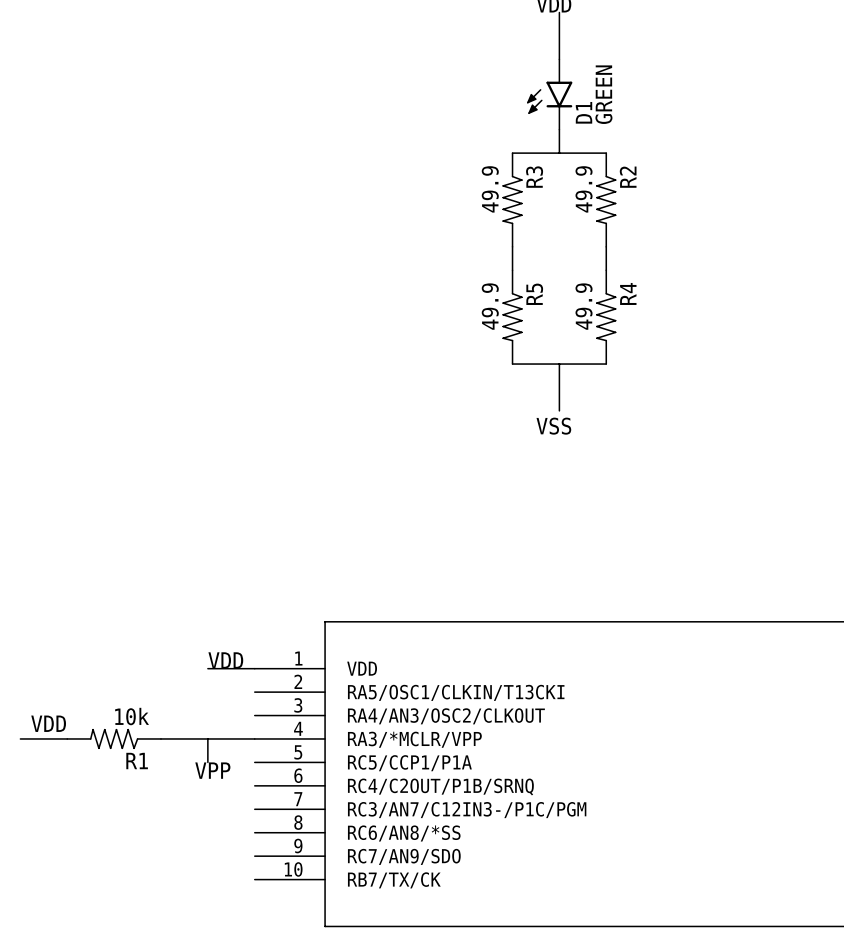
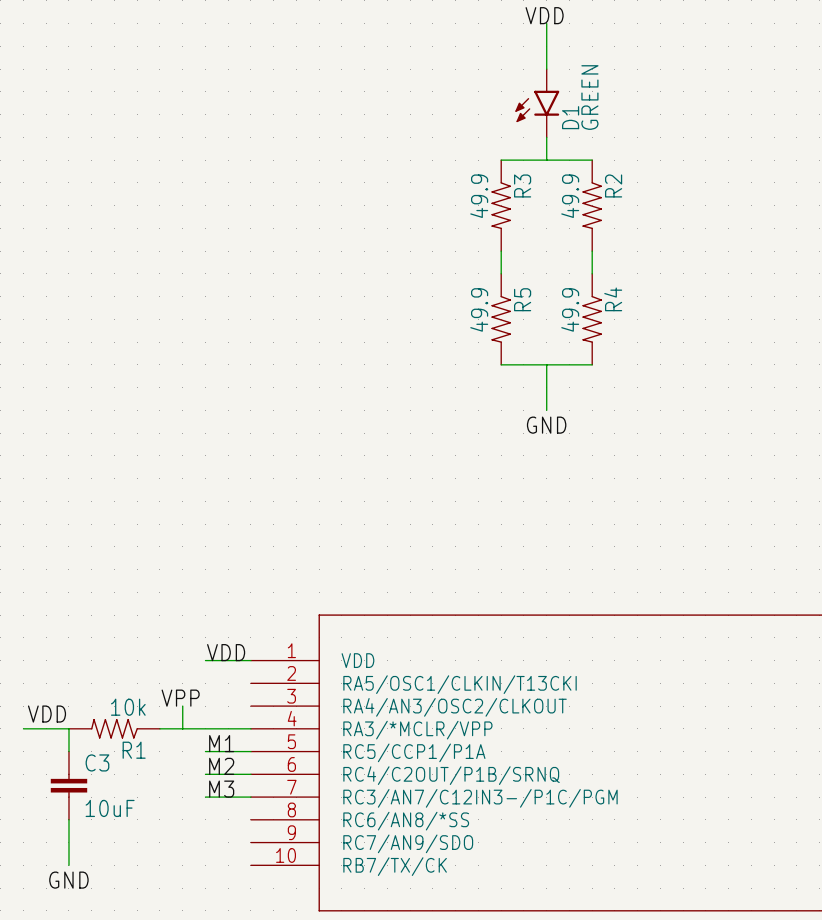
label: VSS (553, 426) -> GND (546, 425)
wire: none -> (182, 706) (182, 728)
wire: none -> (68, 728) (68, 751)
wire: (207, 738) (207, 762) -> (250, 751) (205, 751)
label: none -> M1 (221, 743)
label position: VPP (212, 770) -> VPP (180, 698)
label: none -> M2 (221, 766)
wire: none -> (205, 774) (250, 774)
C3: none -> 10uF (68, 785)
label: none -> M3 (221, 789)
wire: none -> (205, 797) (250, 797)
wire: none -> (68, 819) (68, 865)
label: none -> GND (68, 880)

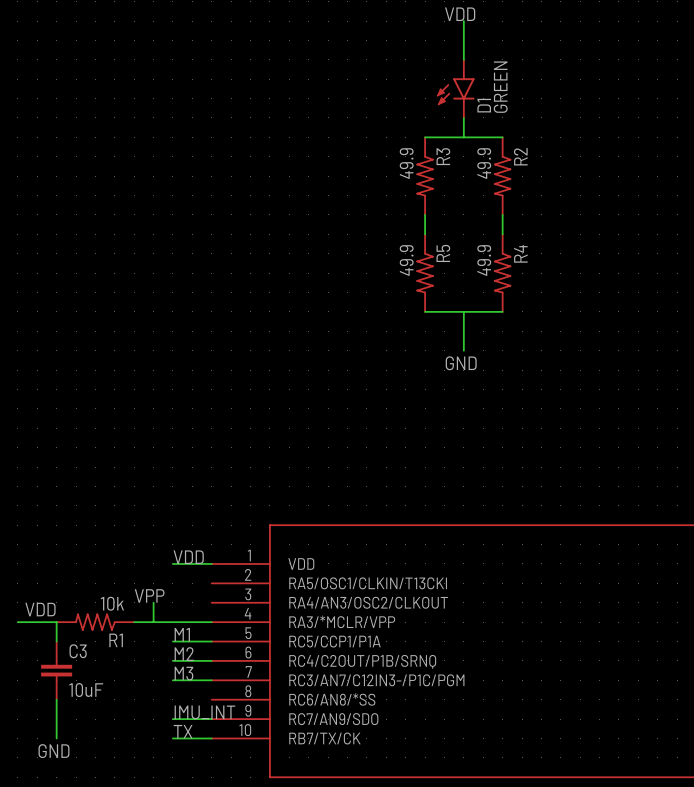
label: none -> IMU_INT (204, 712)
wire: none -> (172, 719) (211, 719)
label: none -> TX (183, 731)
wire: none -> (172, 738) (211, 738)

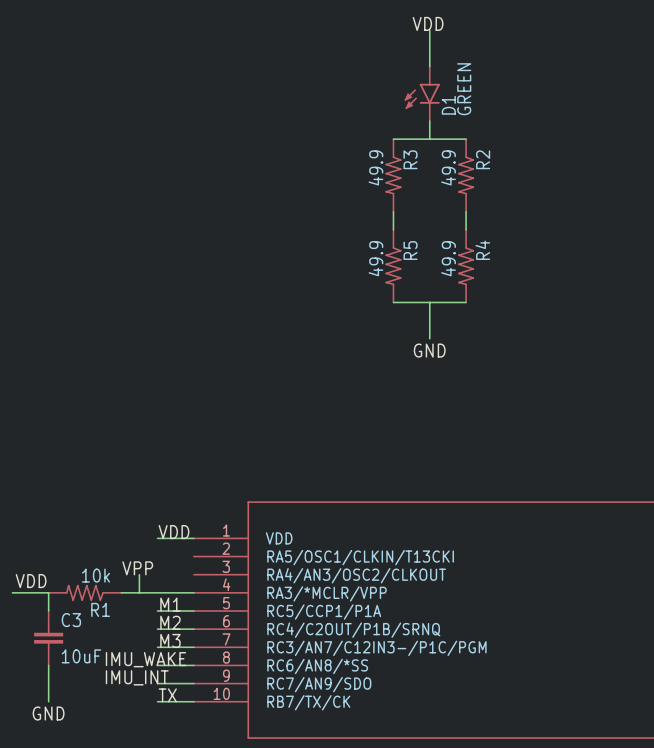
label: none -> IMU_WAKE (145, 659)
wire: none -> (157, 665) (193, 665)
label position: IMU_INT (204, 712) -> IMU_INT (137, 677)

